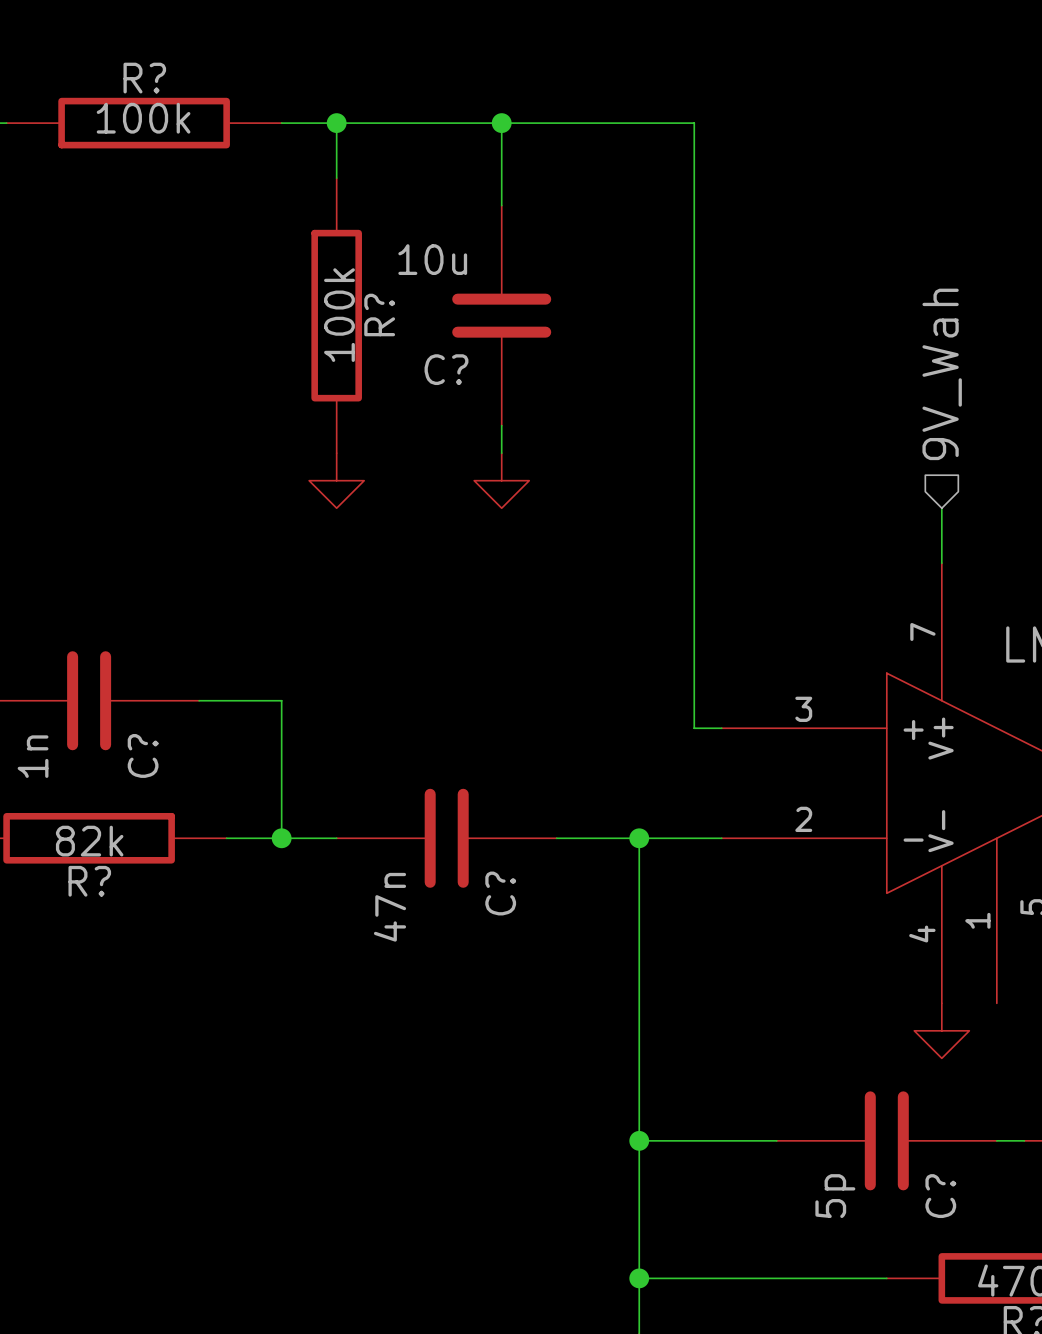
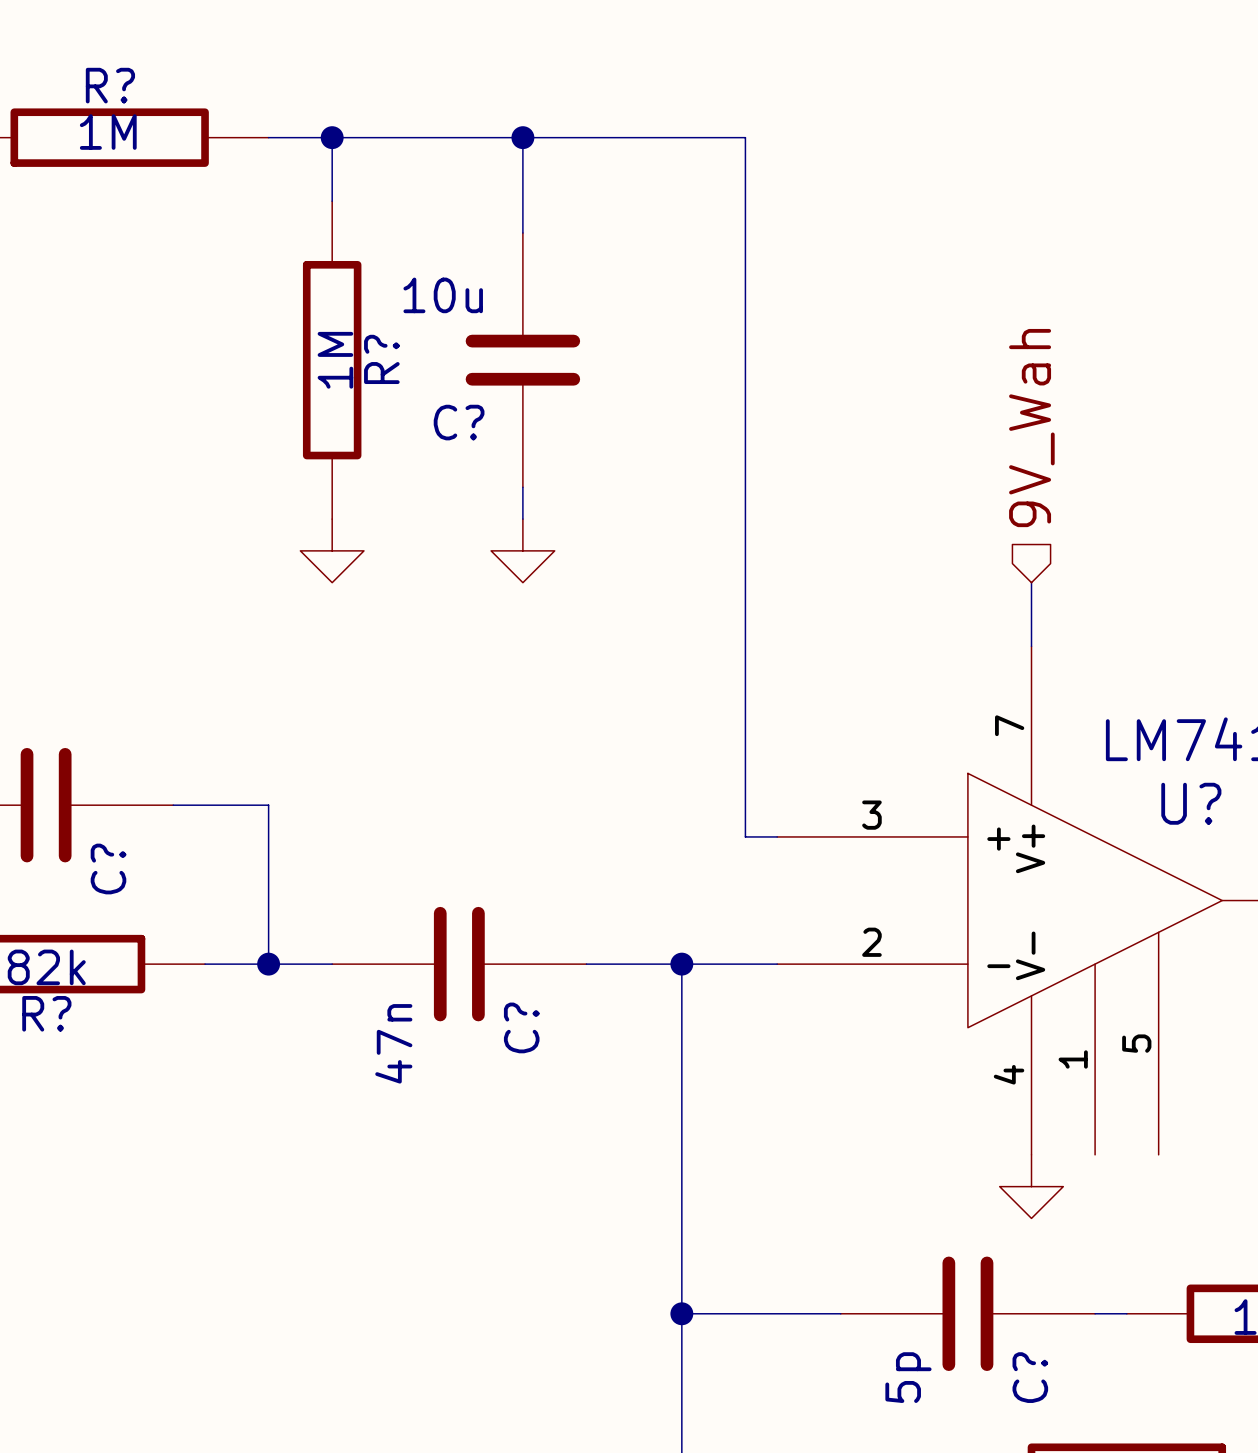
R? value: 100k (143, 118) -> 1M (108, 132)
R? value: 100k (339, 315) -> 1M (335, 360)

